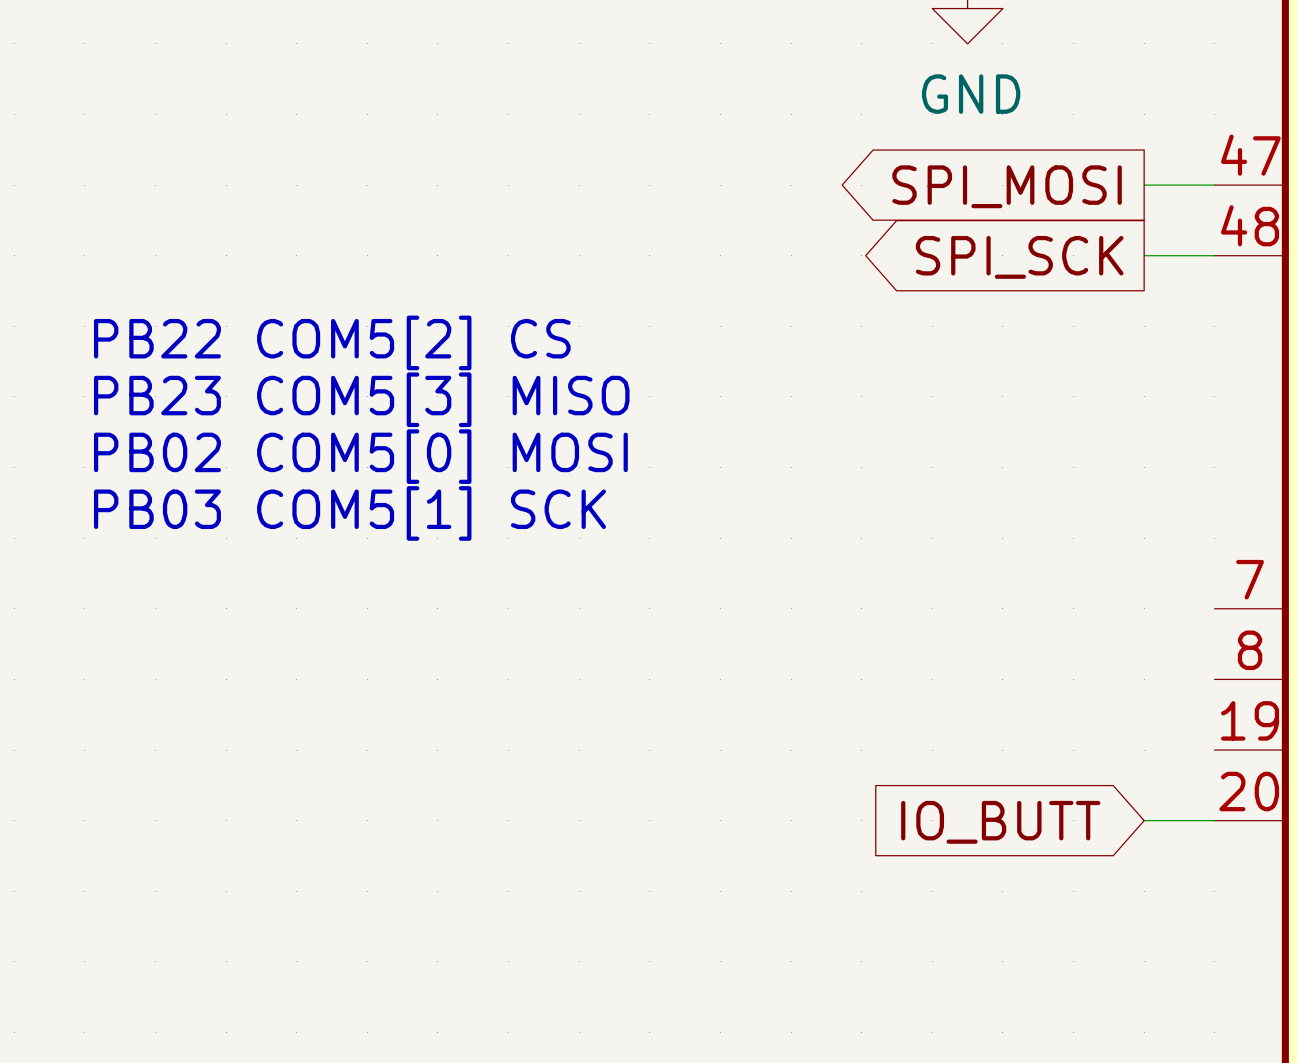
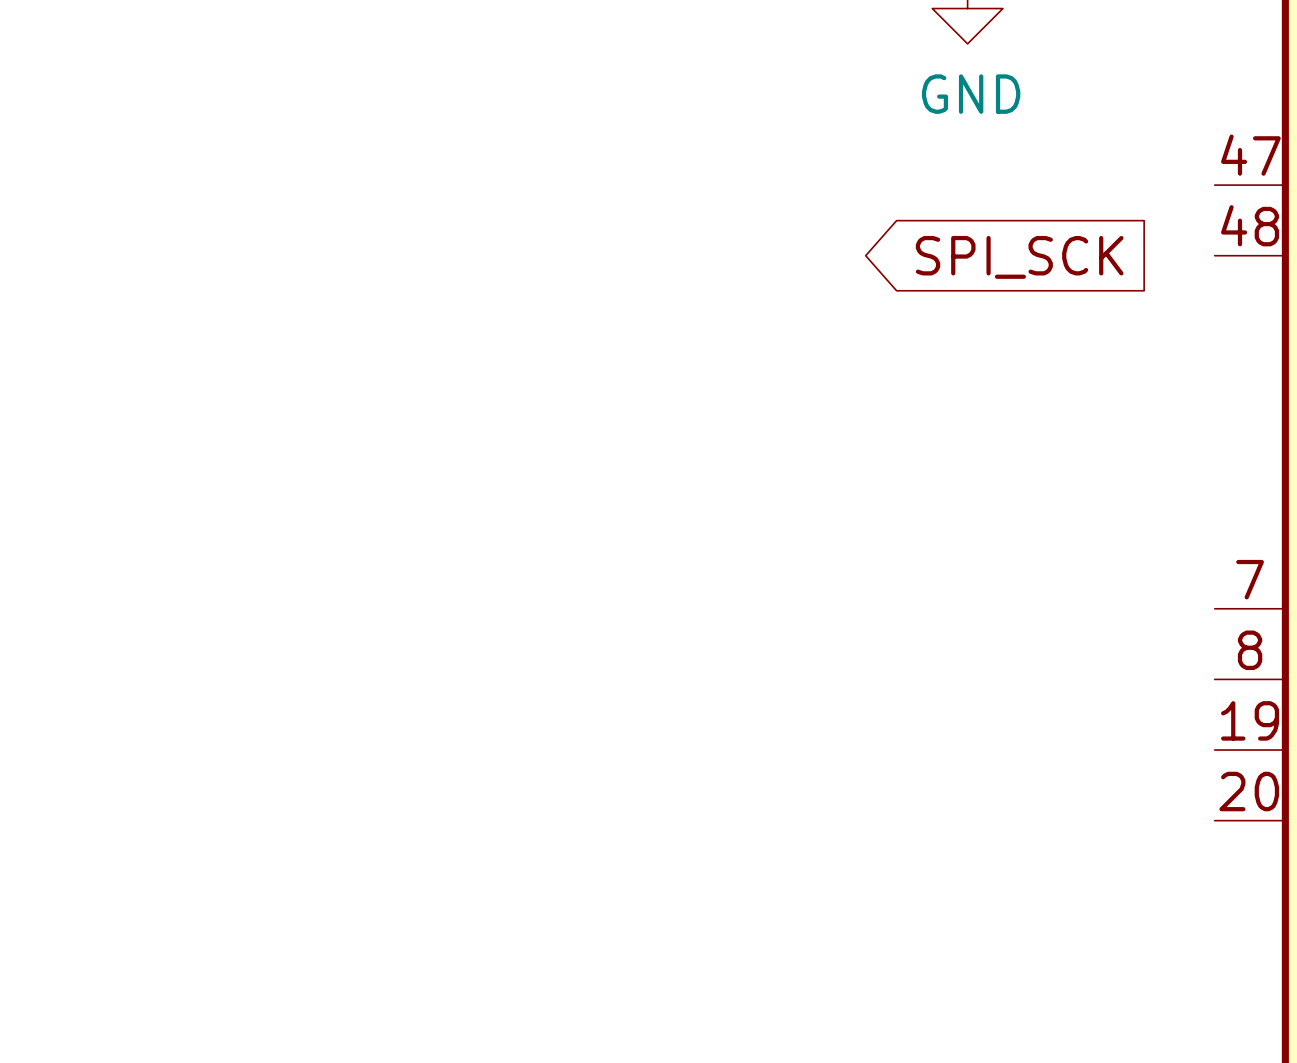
wire: (1144, 185) (1214, 185) -> none
global label: SPI_MOSI (1007, 186) -> none
wire: (1144, 255) (1214, 255) -> none
text: PB22 COM5[2] CS (332, 342) -> none
text: PB23 COM5[3] MISO (361, 399) -> none
text: PB02 COM5[0] MOSI (360, 456) -> none
text: PB03 COM5[1] SCK (349, 513) -> none
wire: (1144, 820) (1214, 820) -> none
global label: IO_BUTT (1000, 822) -> none

